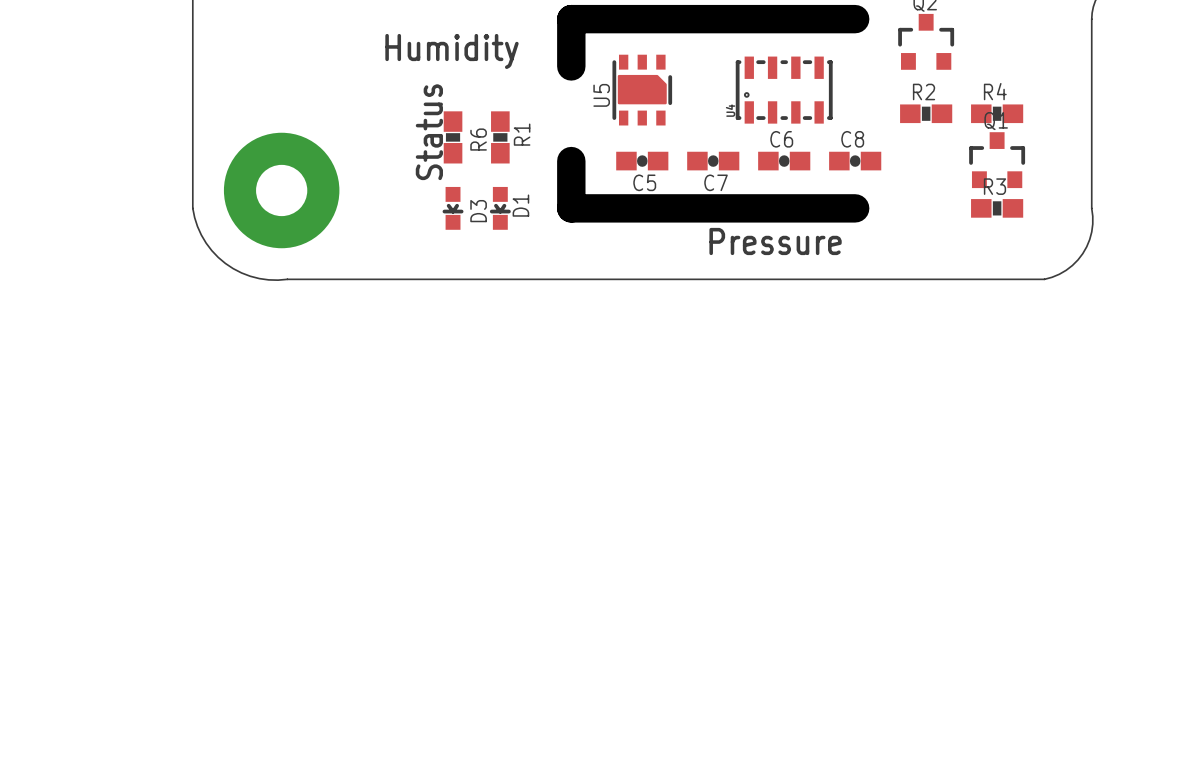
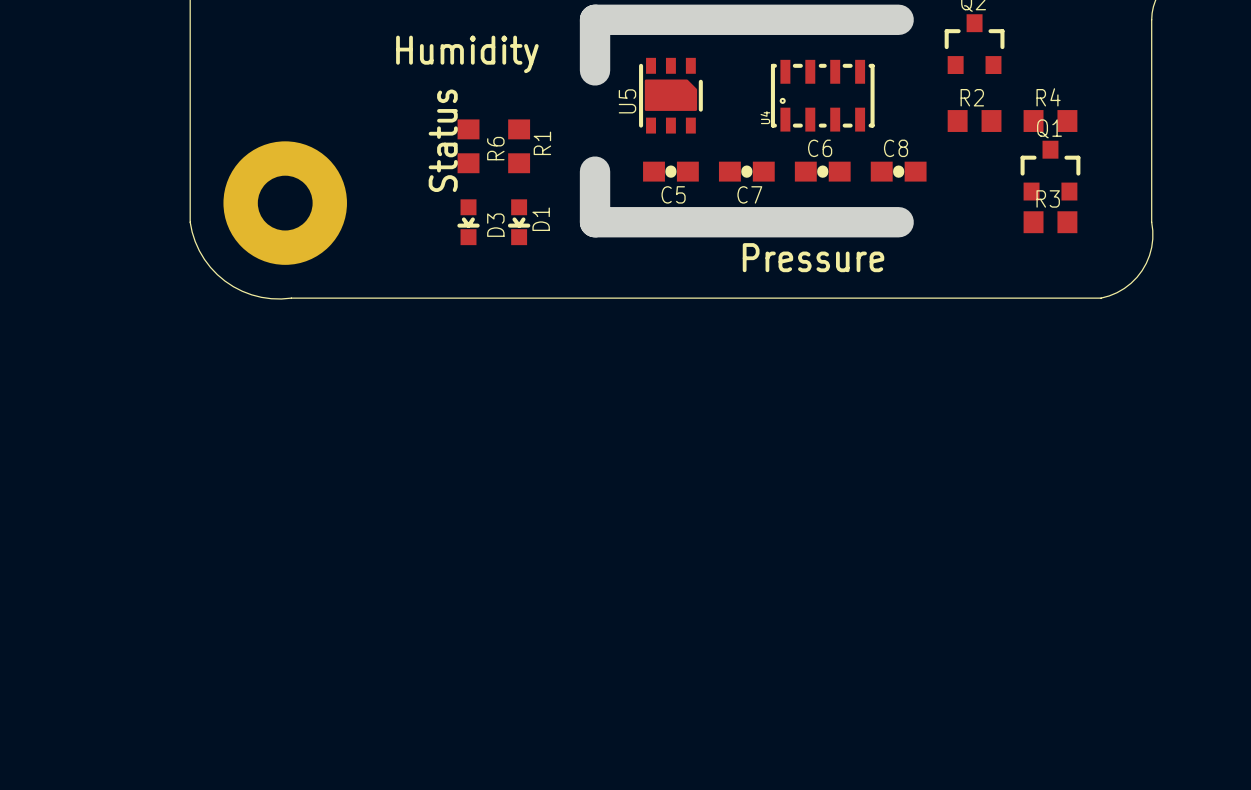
R2 footprint: [900, 104, 953, 124] -> [947, 110, 1002, 132]
R4 footprint: [971, 104, 1024, 124] -> [1023, 110, 1078, 132]
R6 footprint: [443, 111, 463, 164] -> [457, 119, 480, 174]
R1 footprint: [491, 111, 510, 164] -> [508, 119, 531, 174]
R3 footprint: [971, 199, 1024, 218] -> [1023, 211, 1078, 234]

